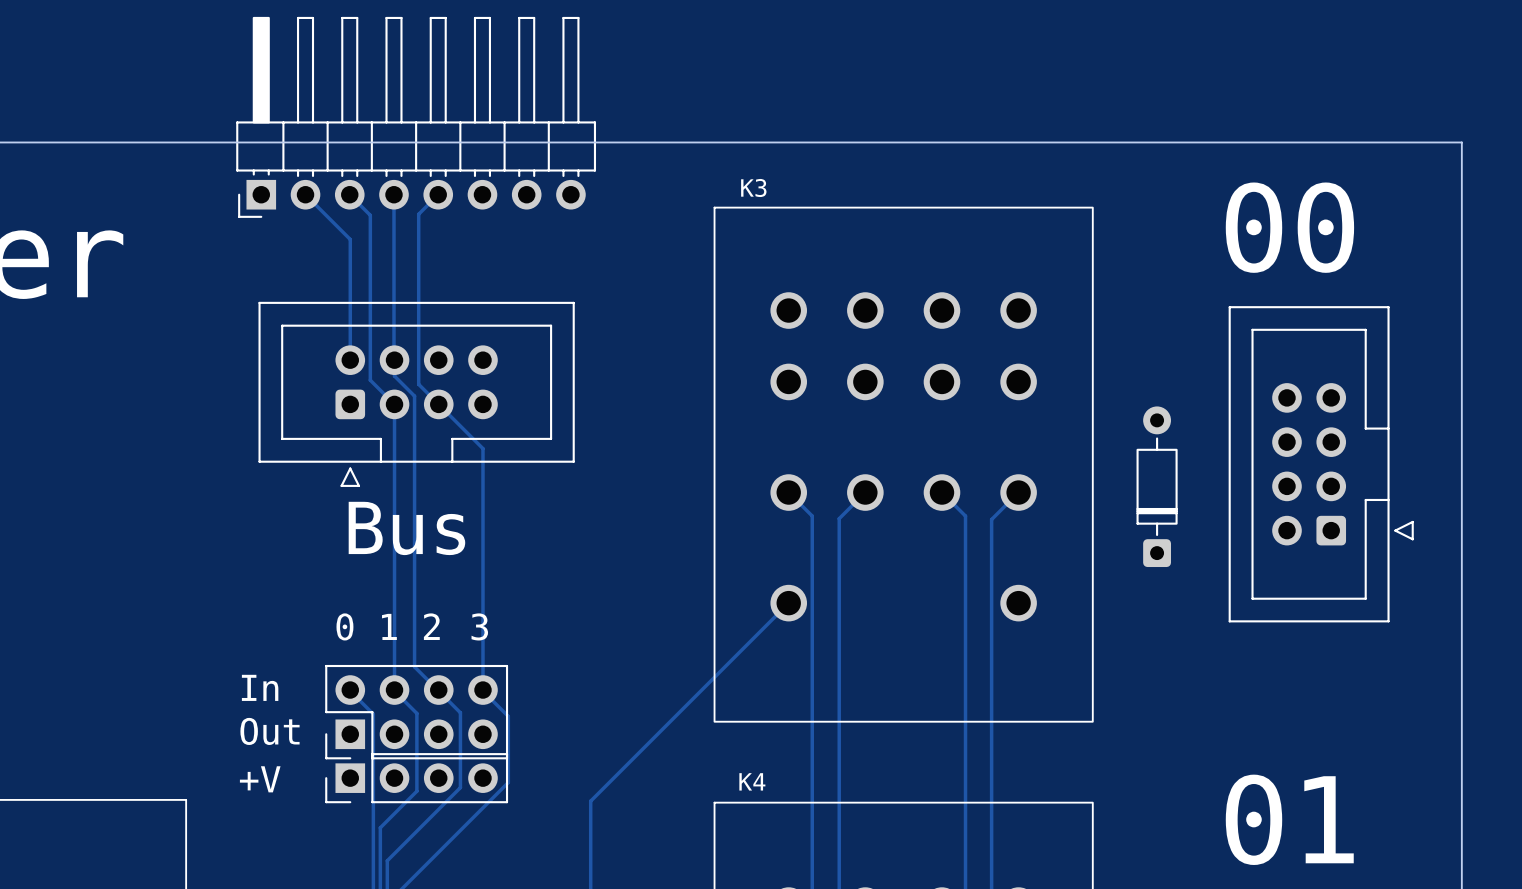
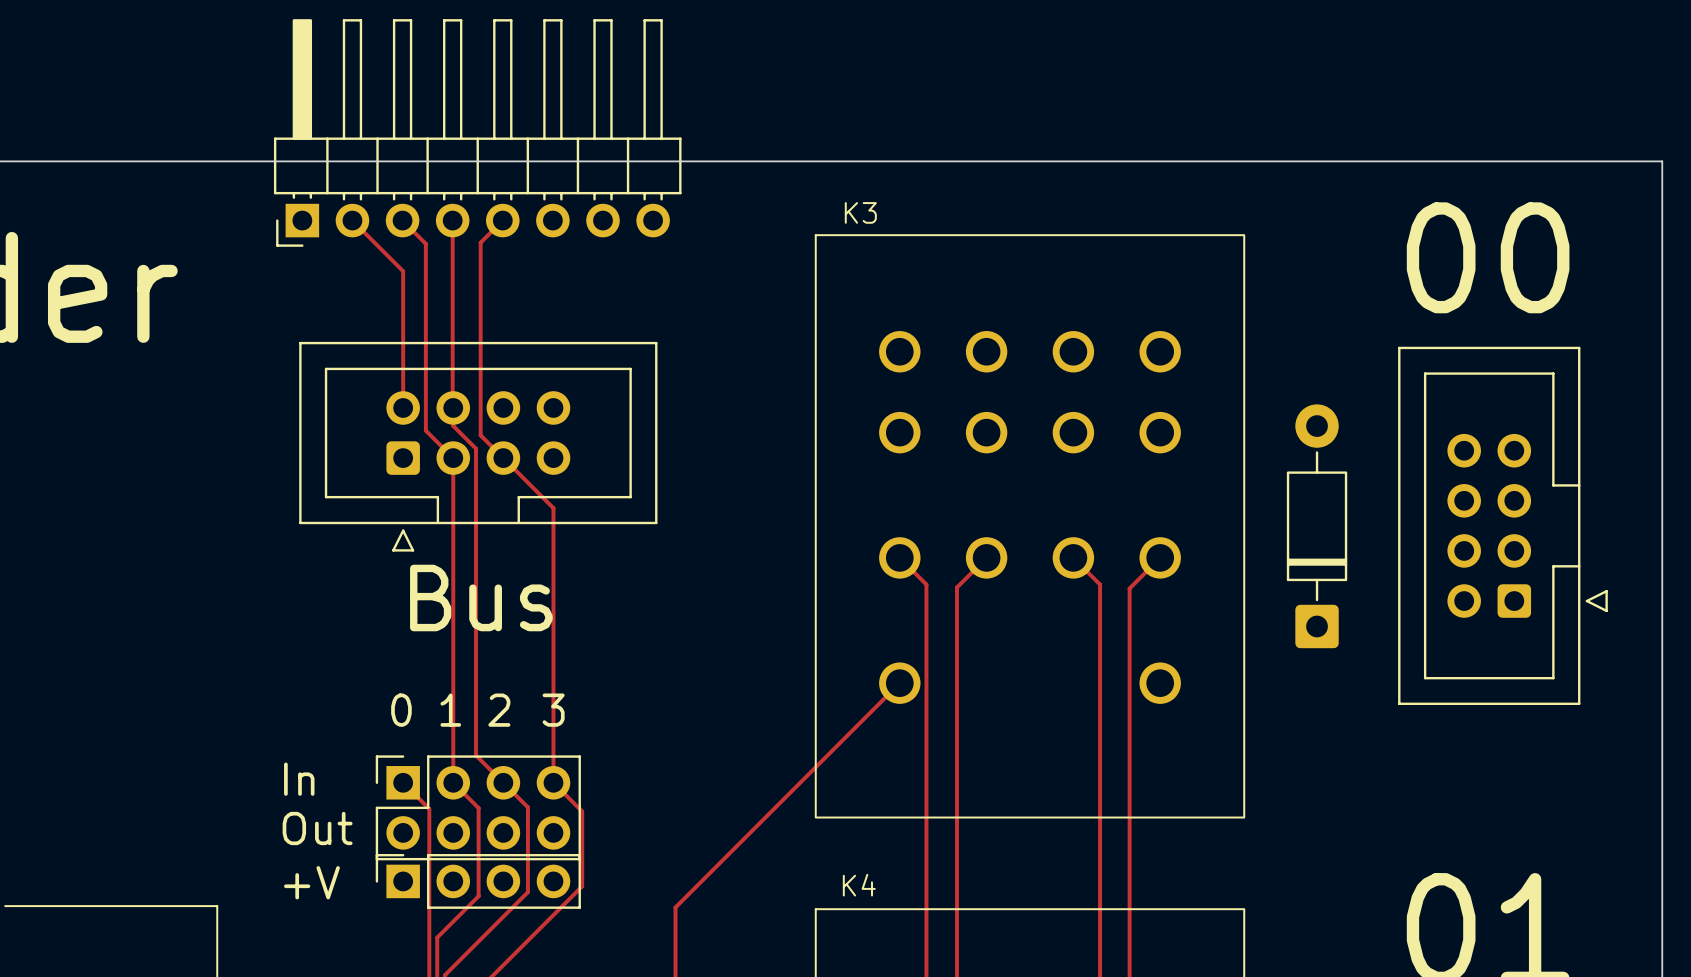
part: none -> (1317, 526)
part: (1157, 486) -> none
part footprint: [325, 664, 509, 760] -> [375, 755, 581, 861]
part footprint: [325, 753, 509, 804] -> [375, 854, 581, 909]

